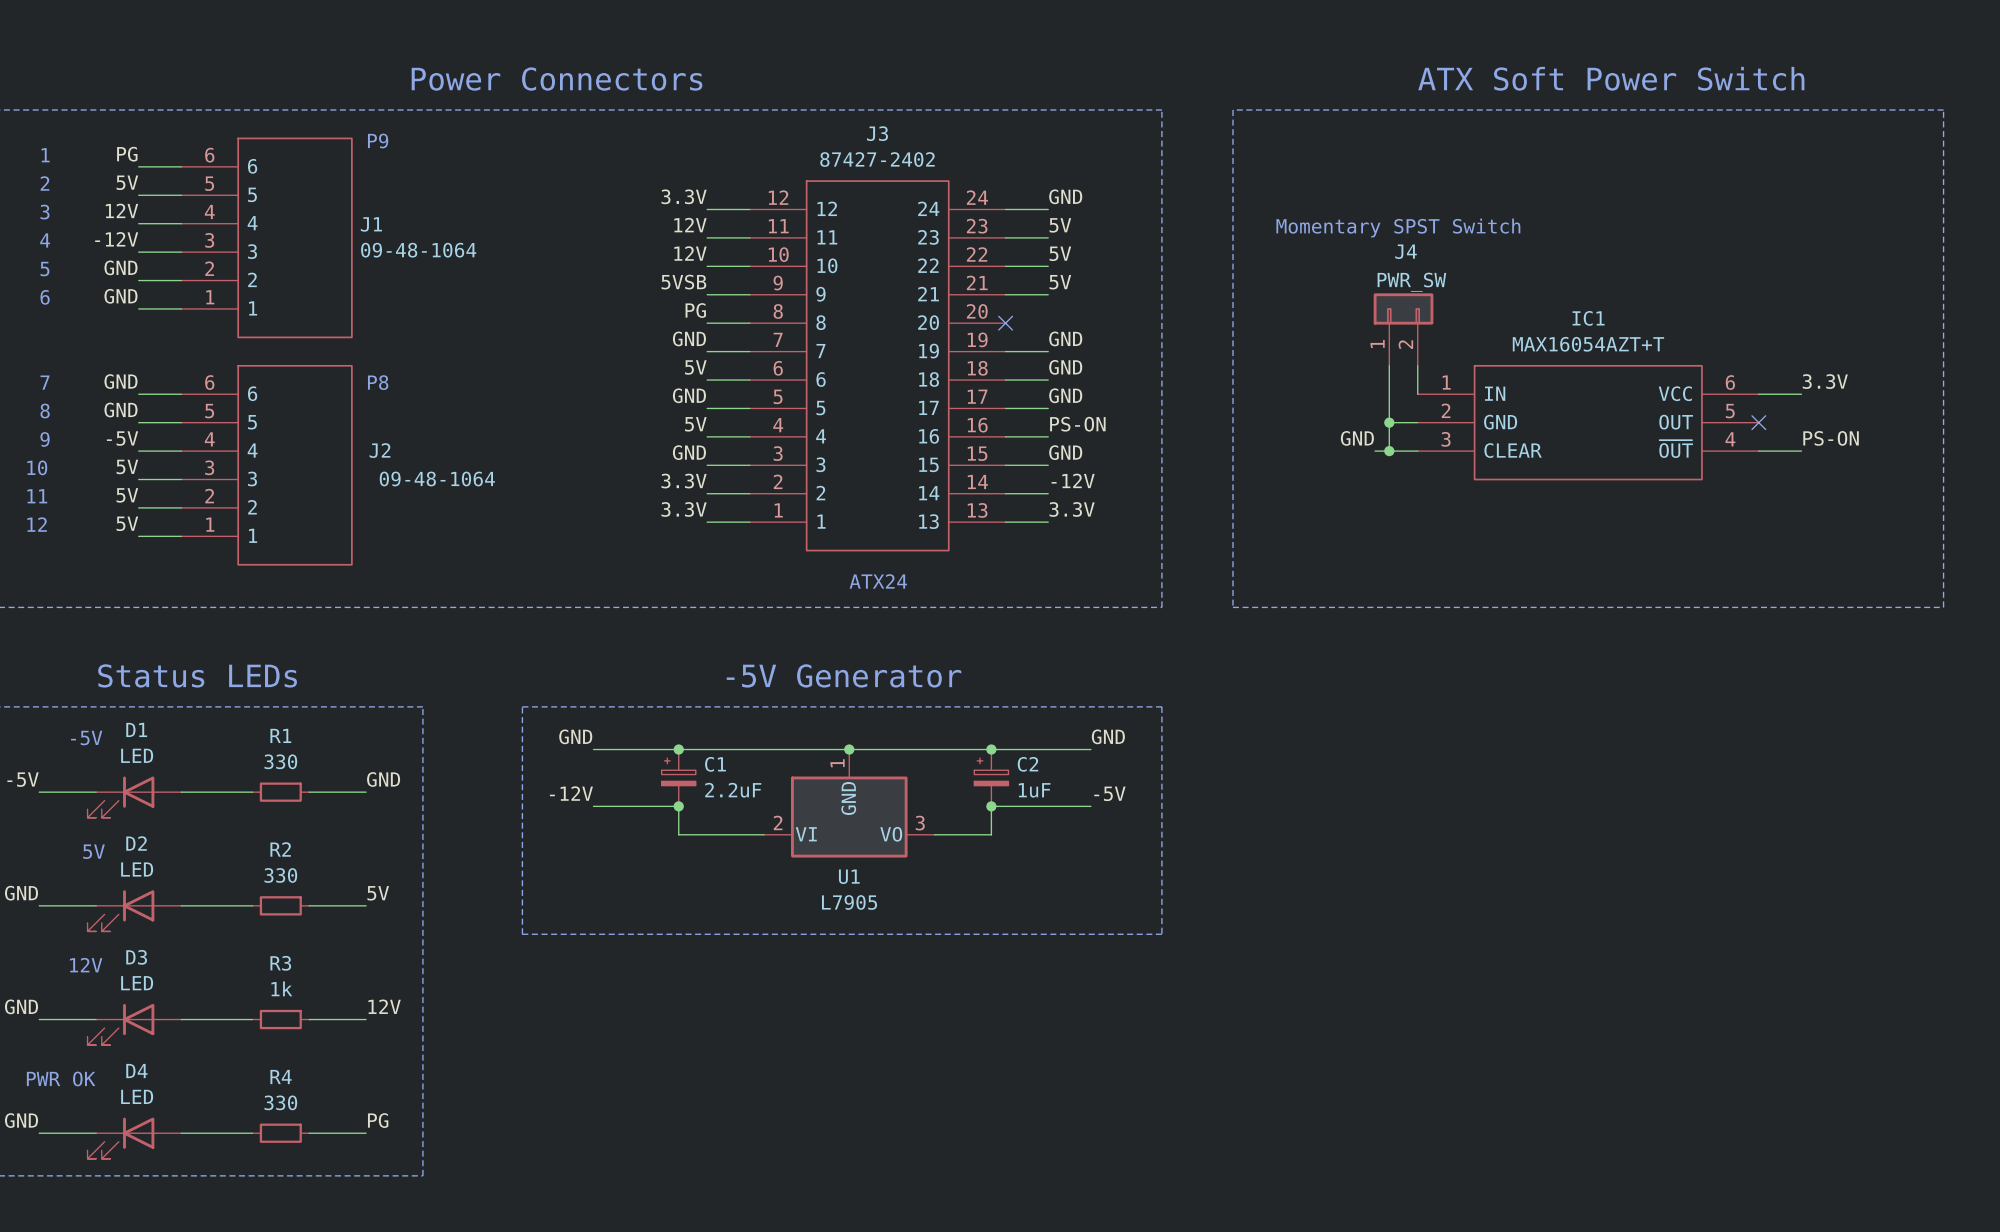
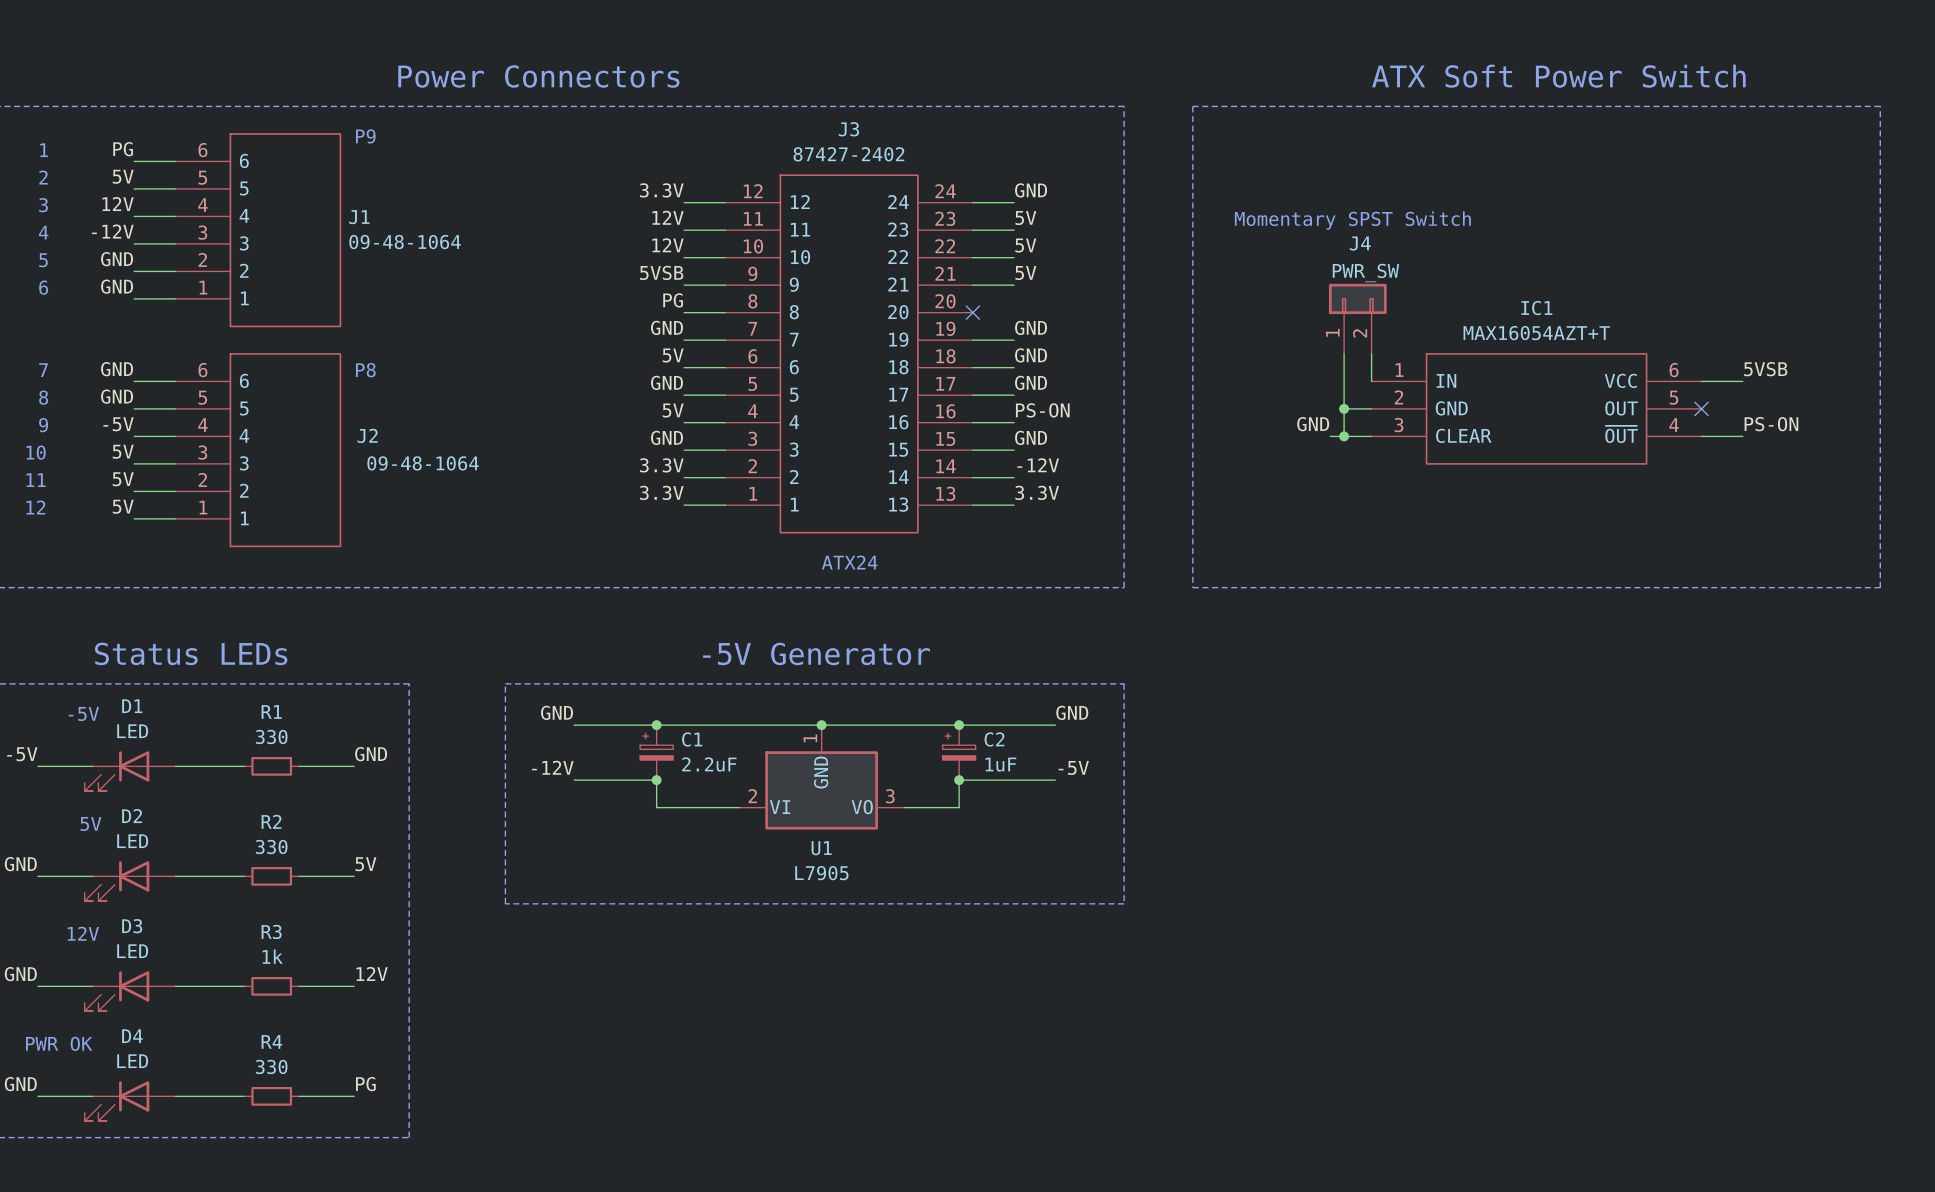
label: 3.3V (1825, 381) -> 5VSB (1765, 369)

